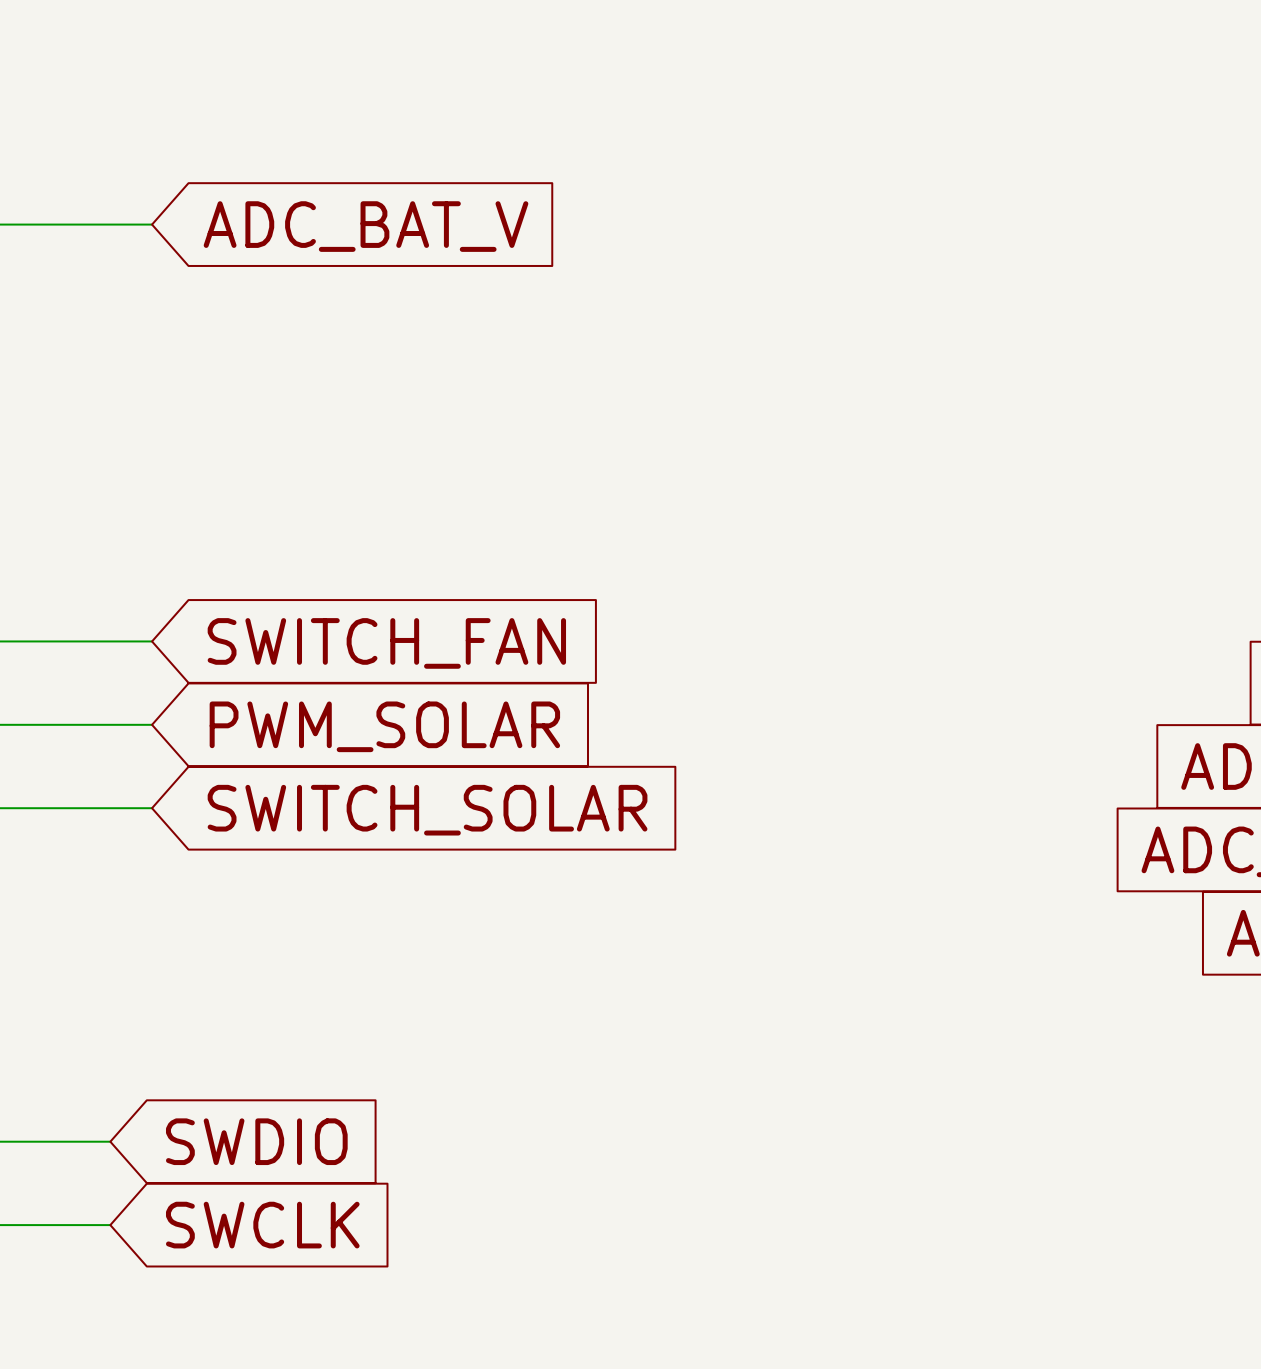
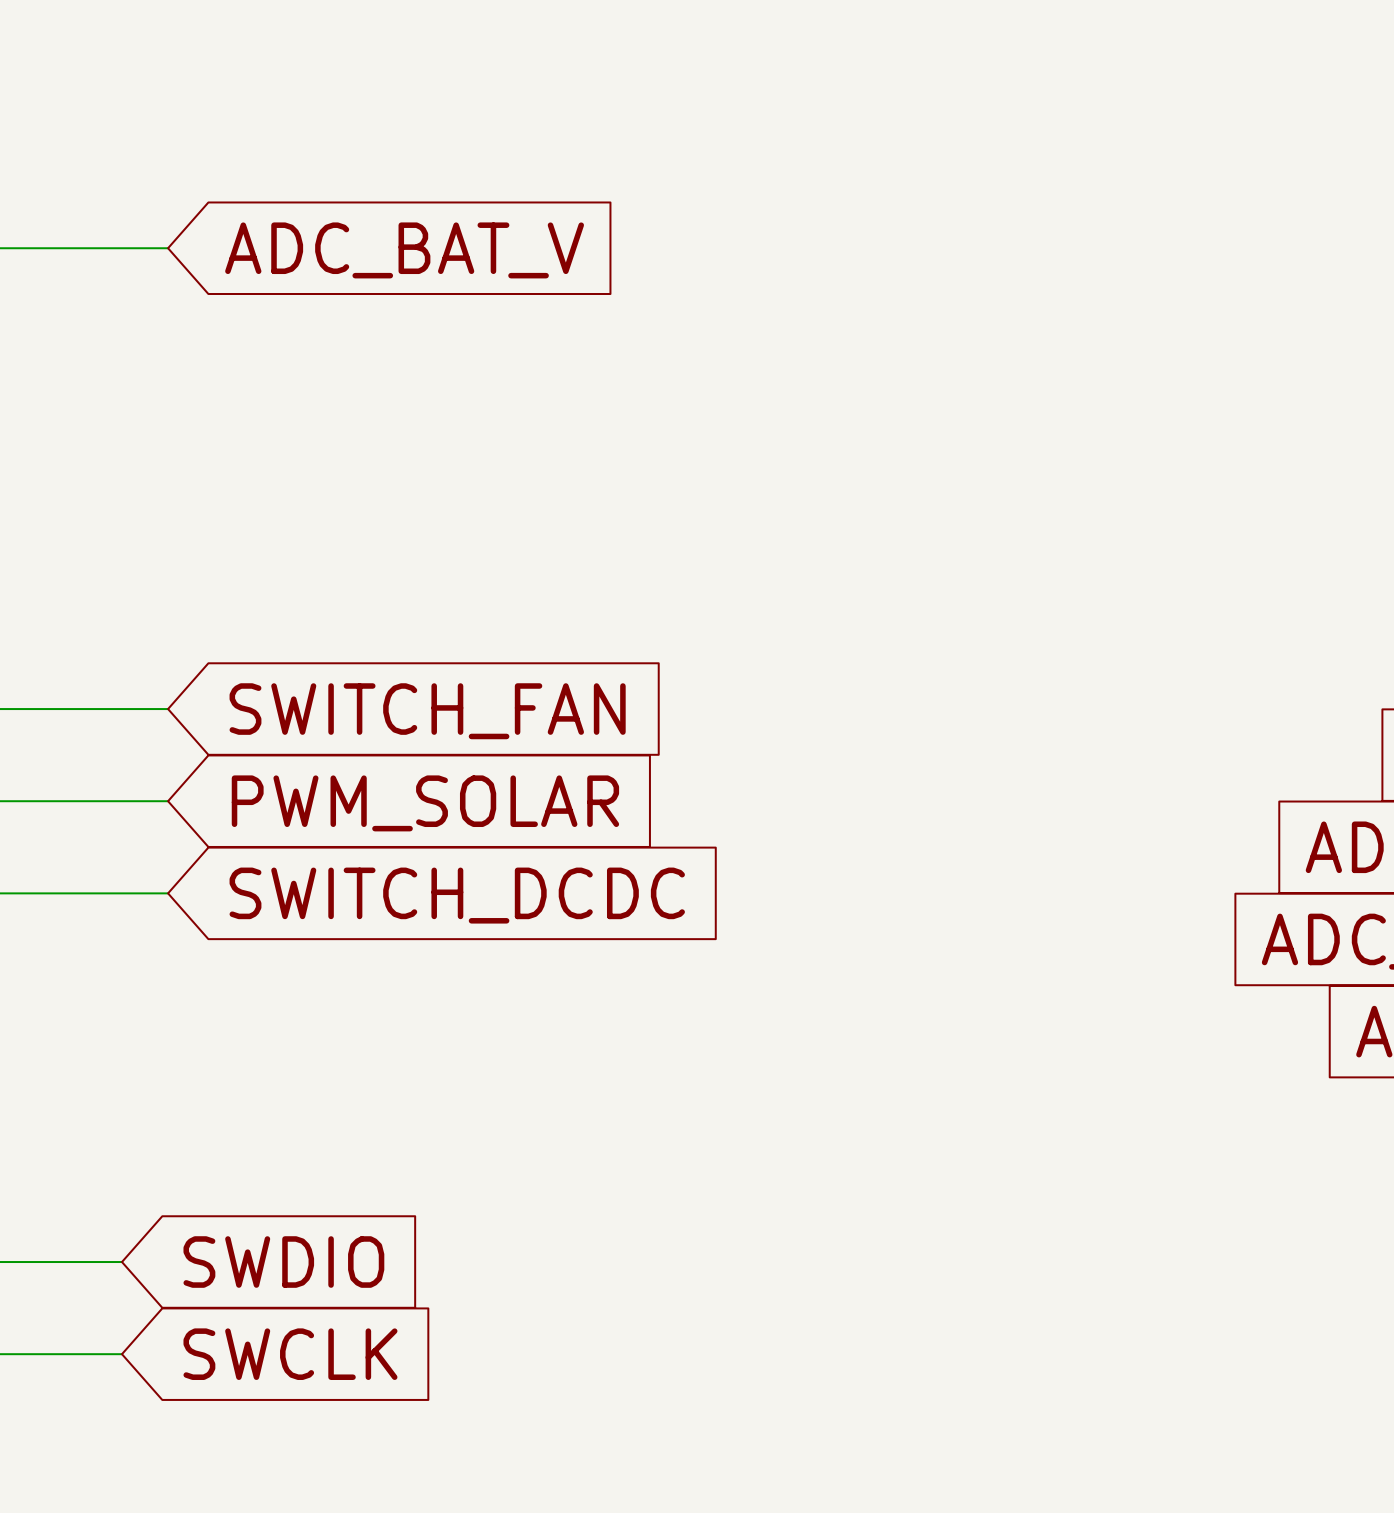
global label: SWITCH_SOLAR (427, 810) -> SWITCH_DCDC (457, 895)

